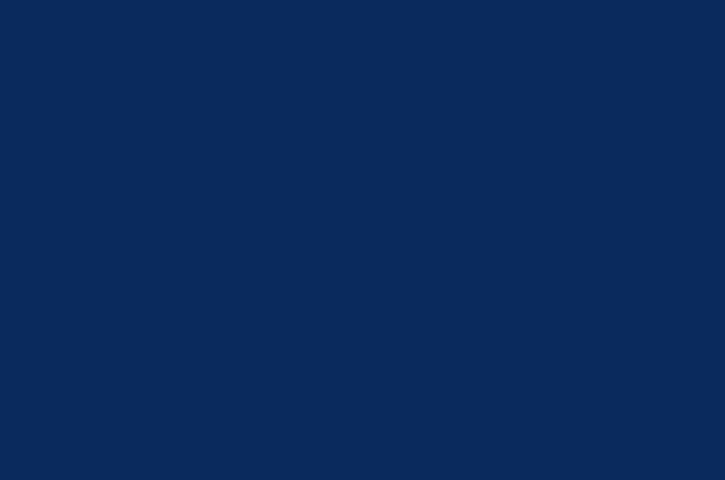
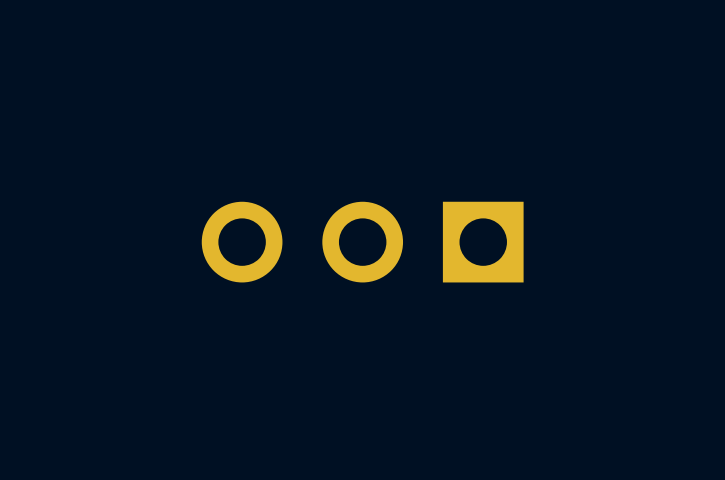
part: none -> (362, 242)

